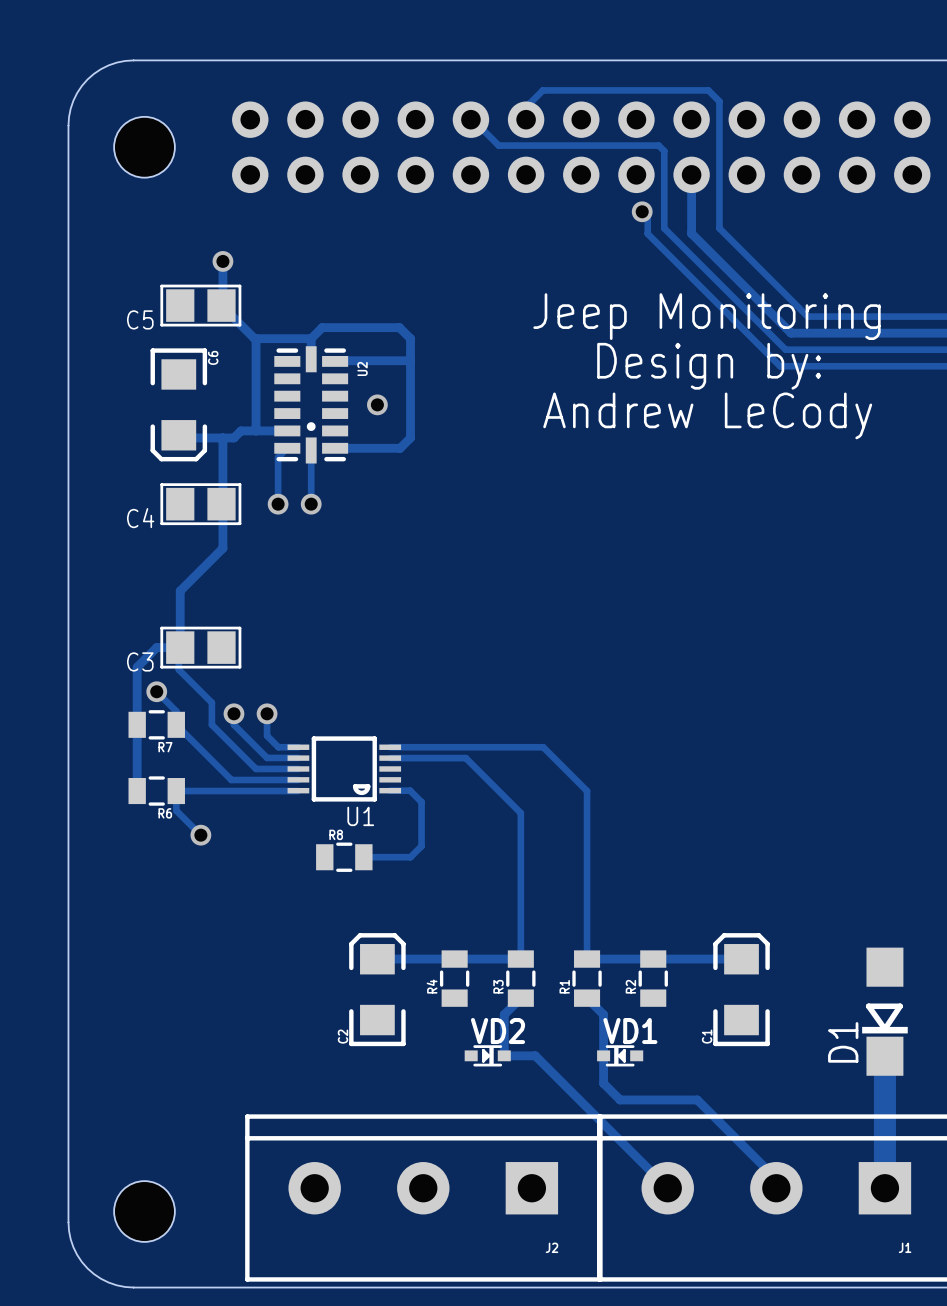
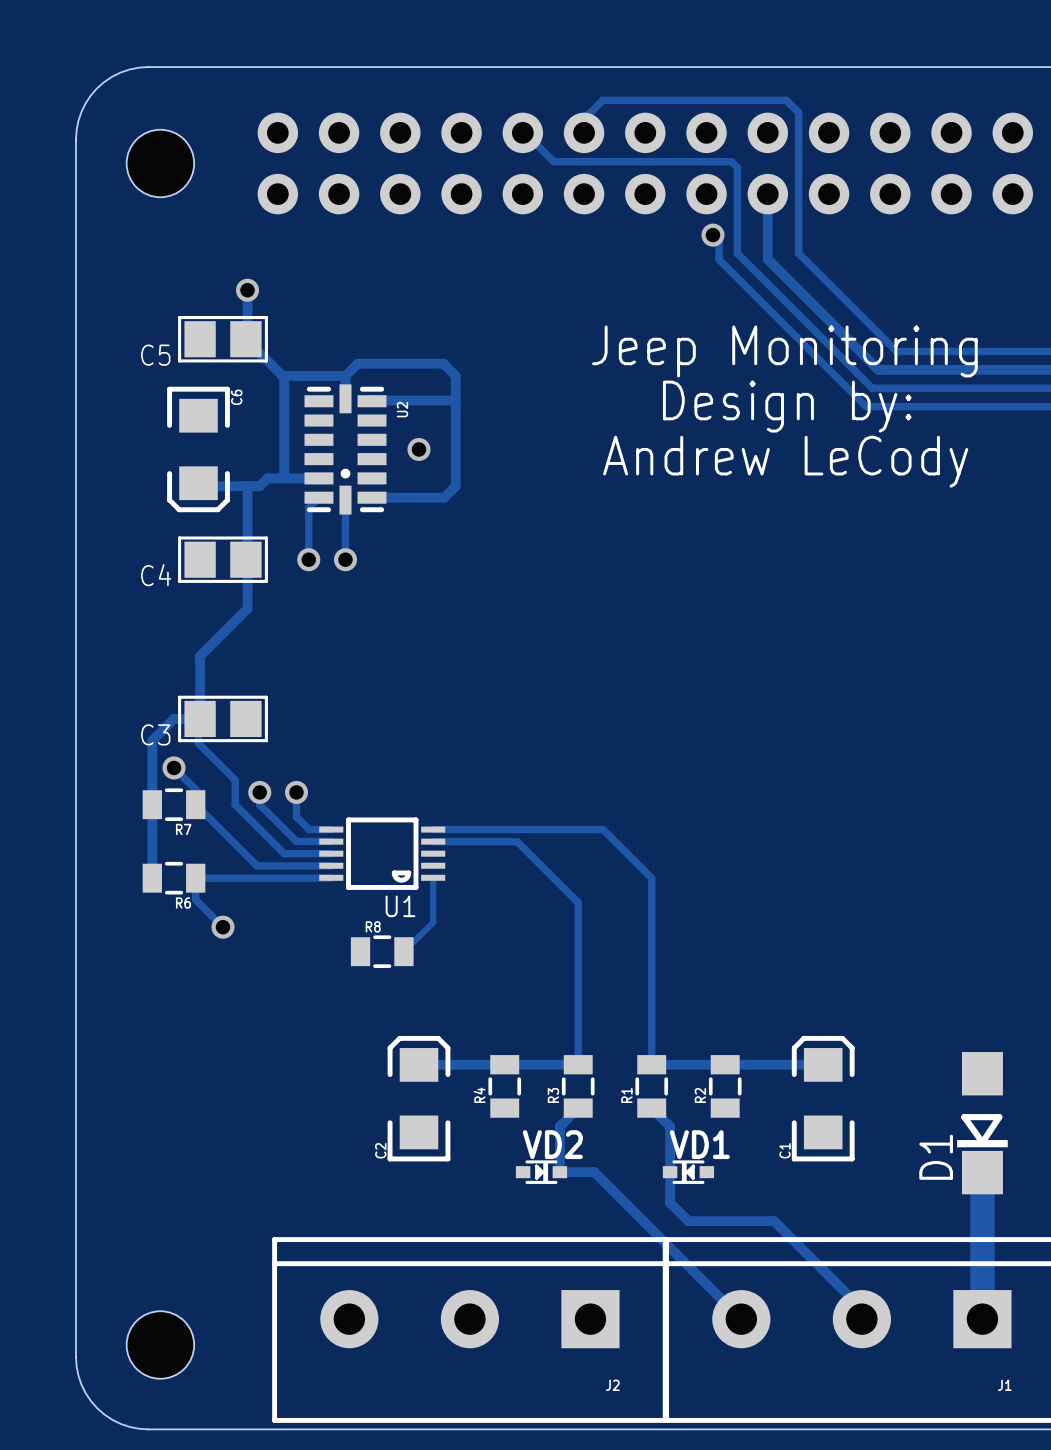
track: (390, 790) (410, 790) (421, 802) (421, 846) (410, 857) (363, 857) -> (433, 877) (433, 922) (403, 951)

